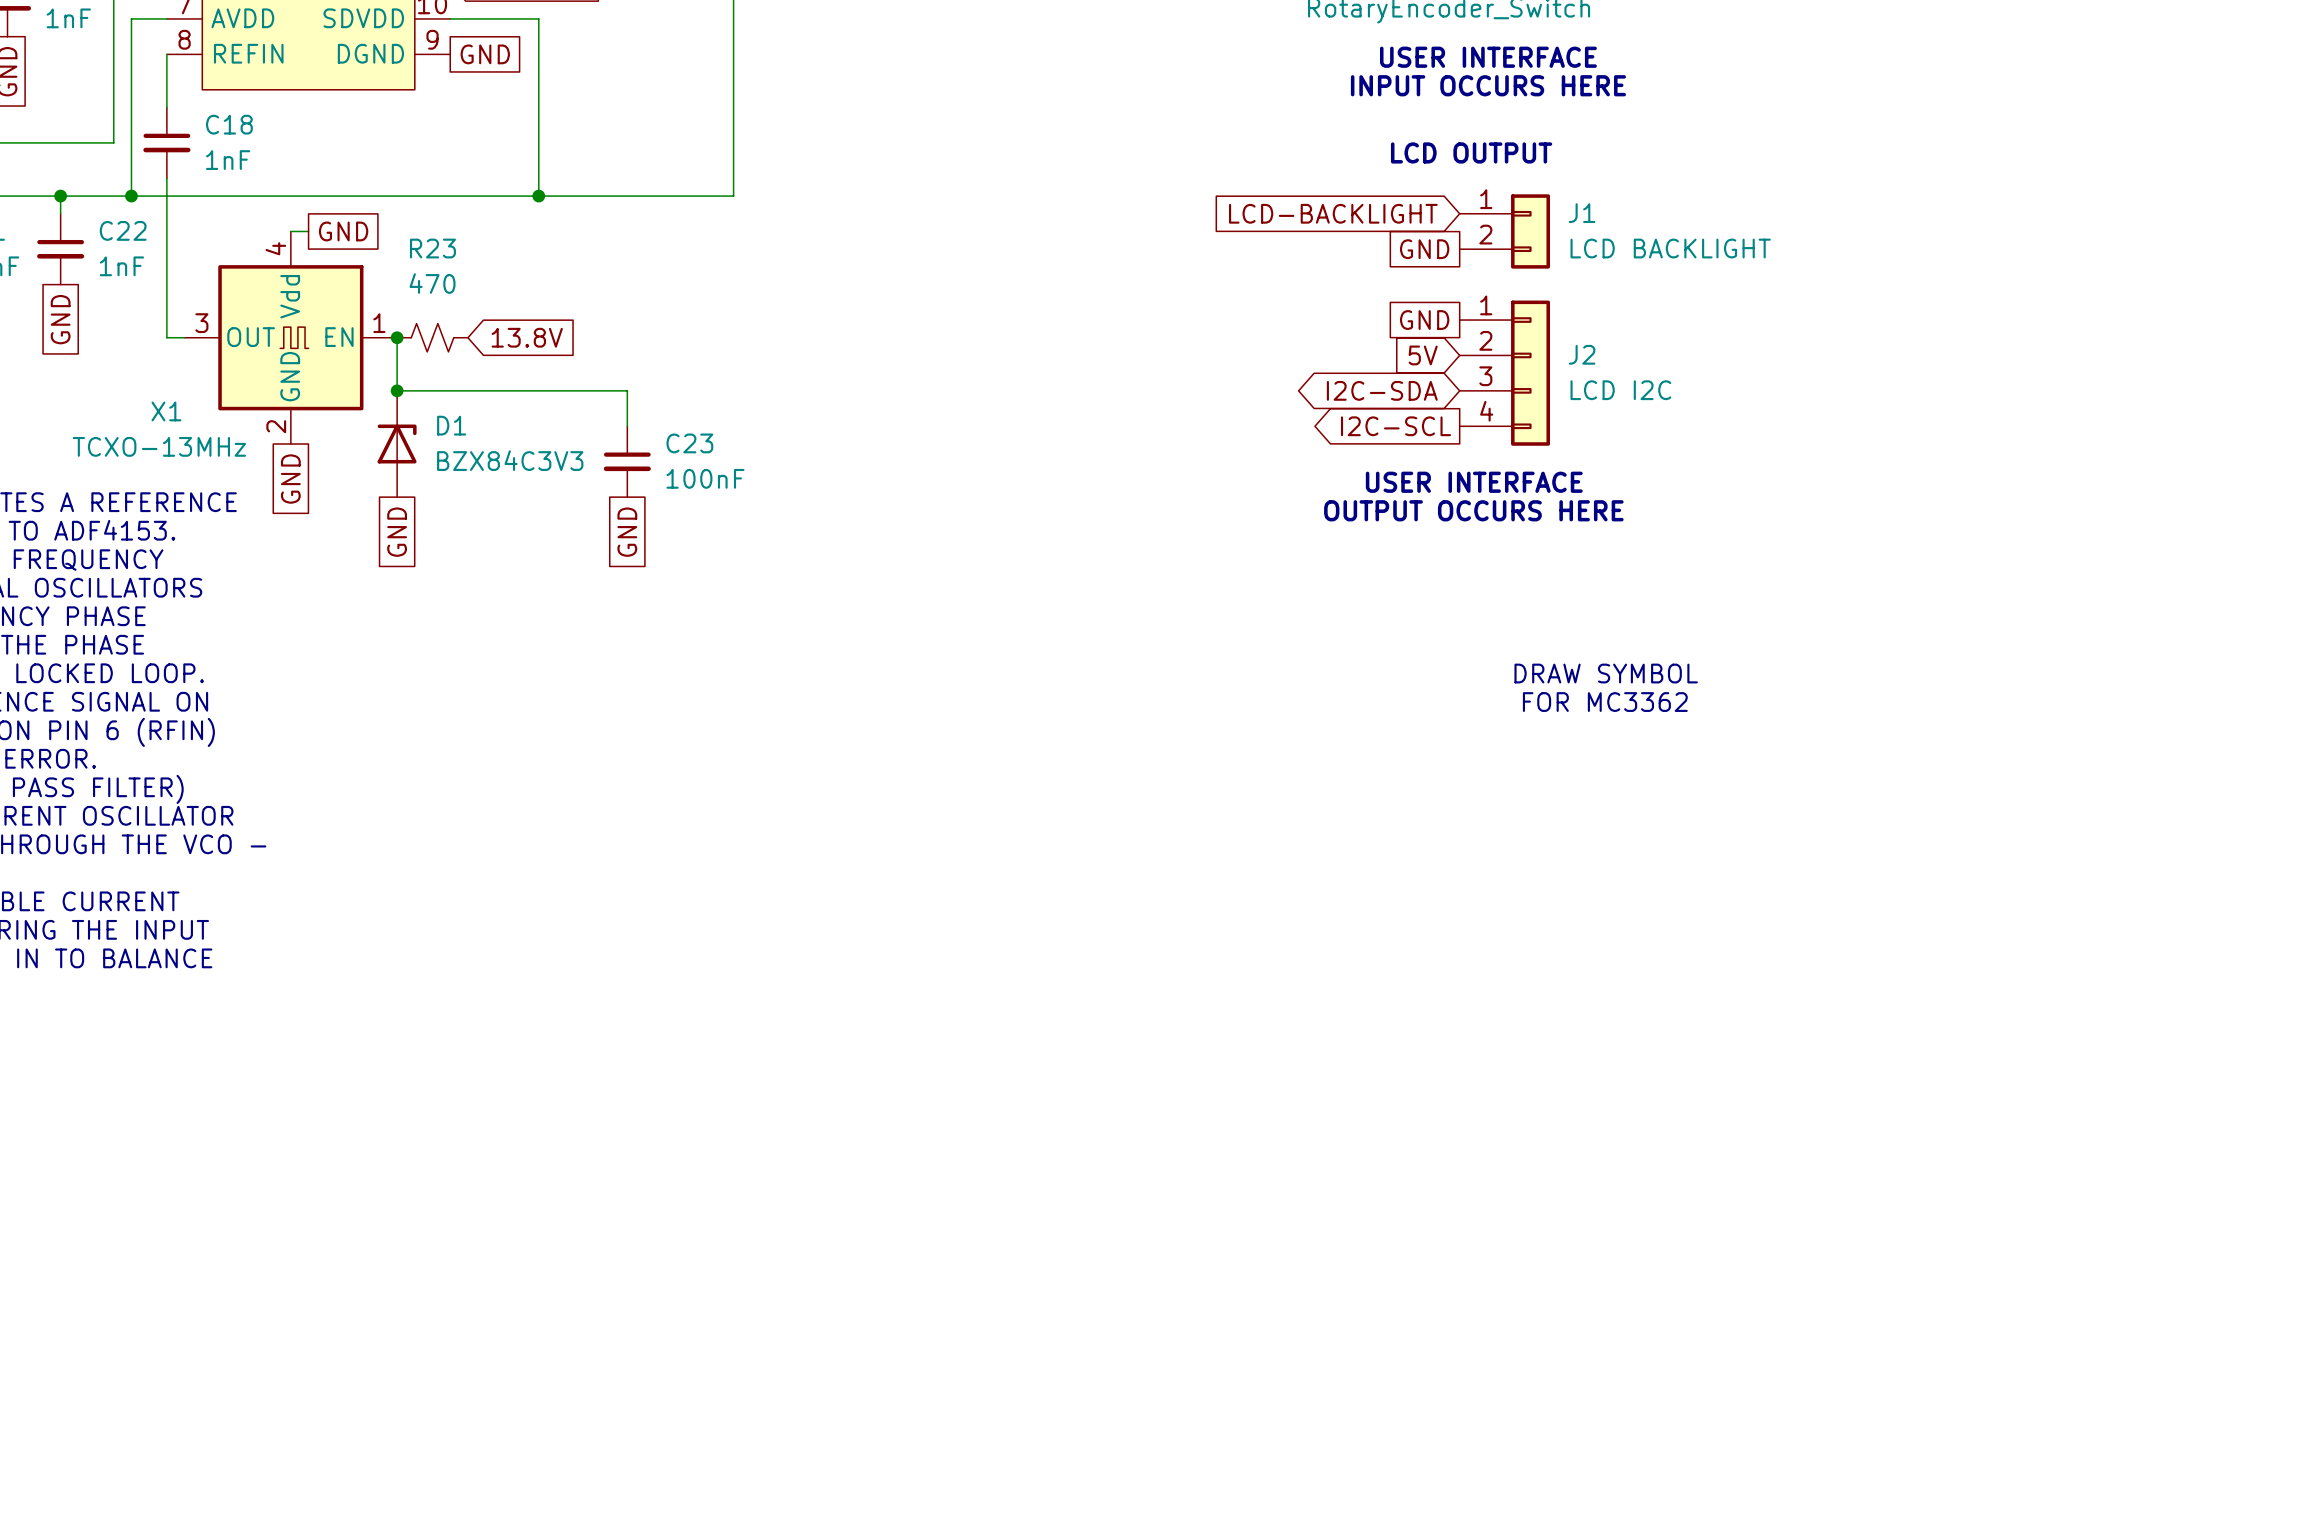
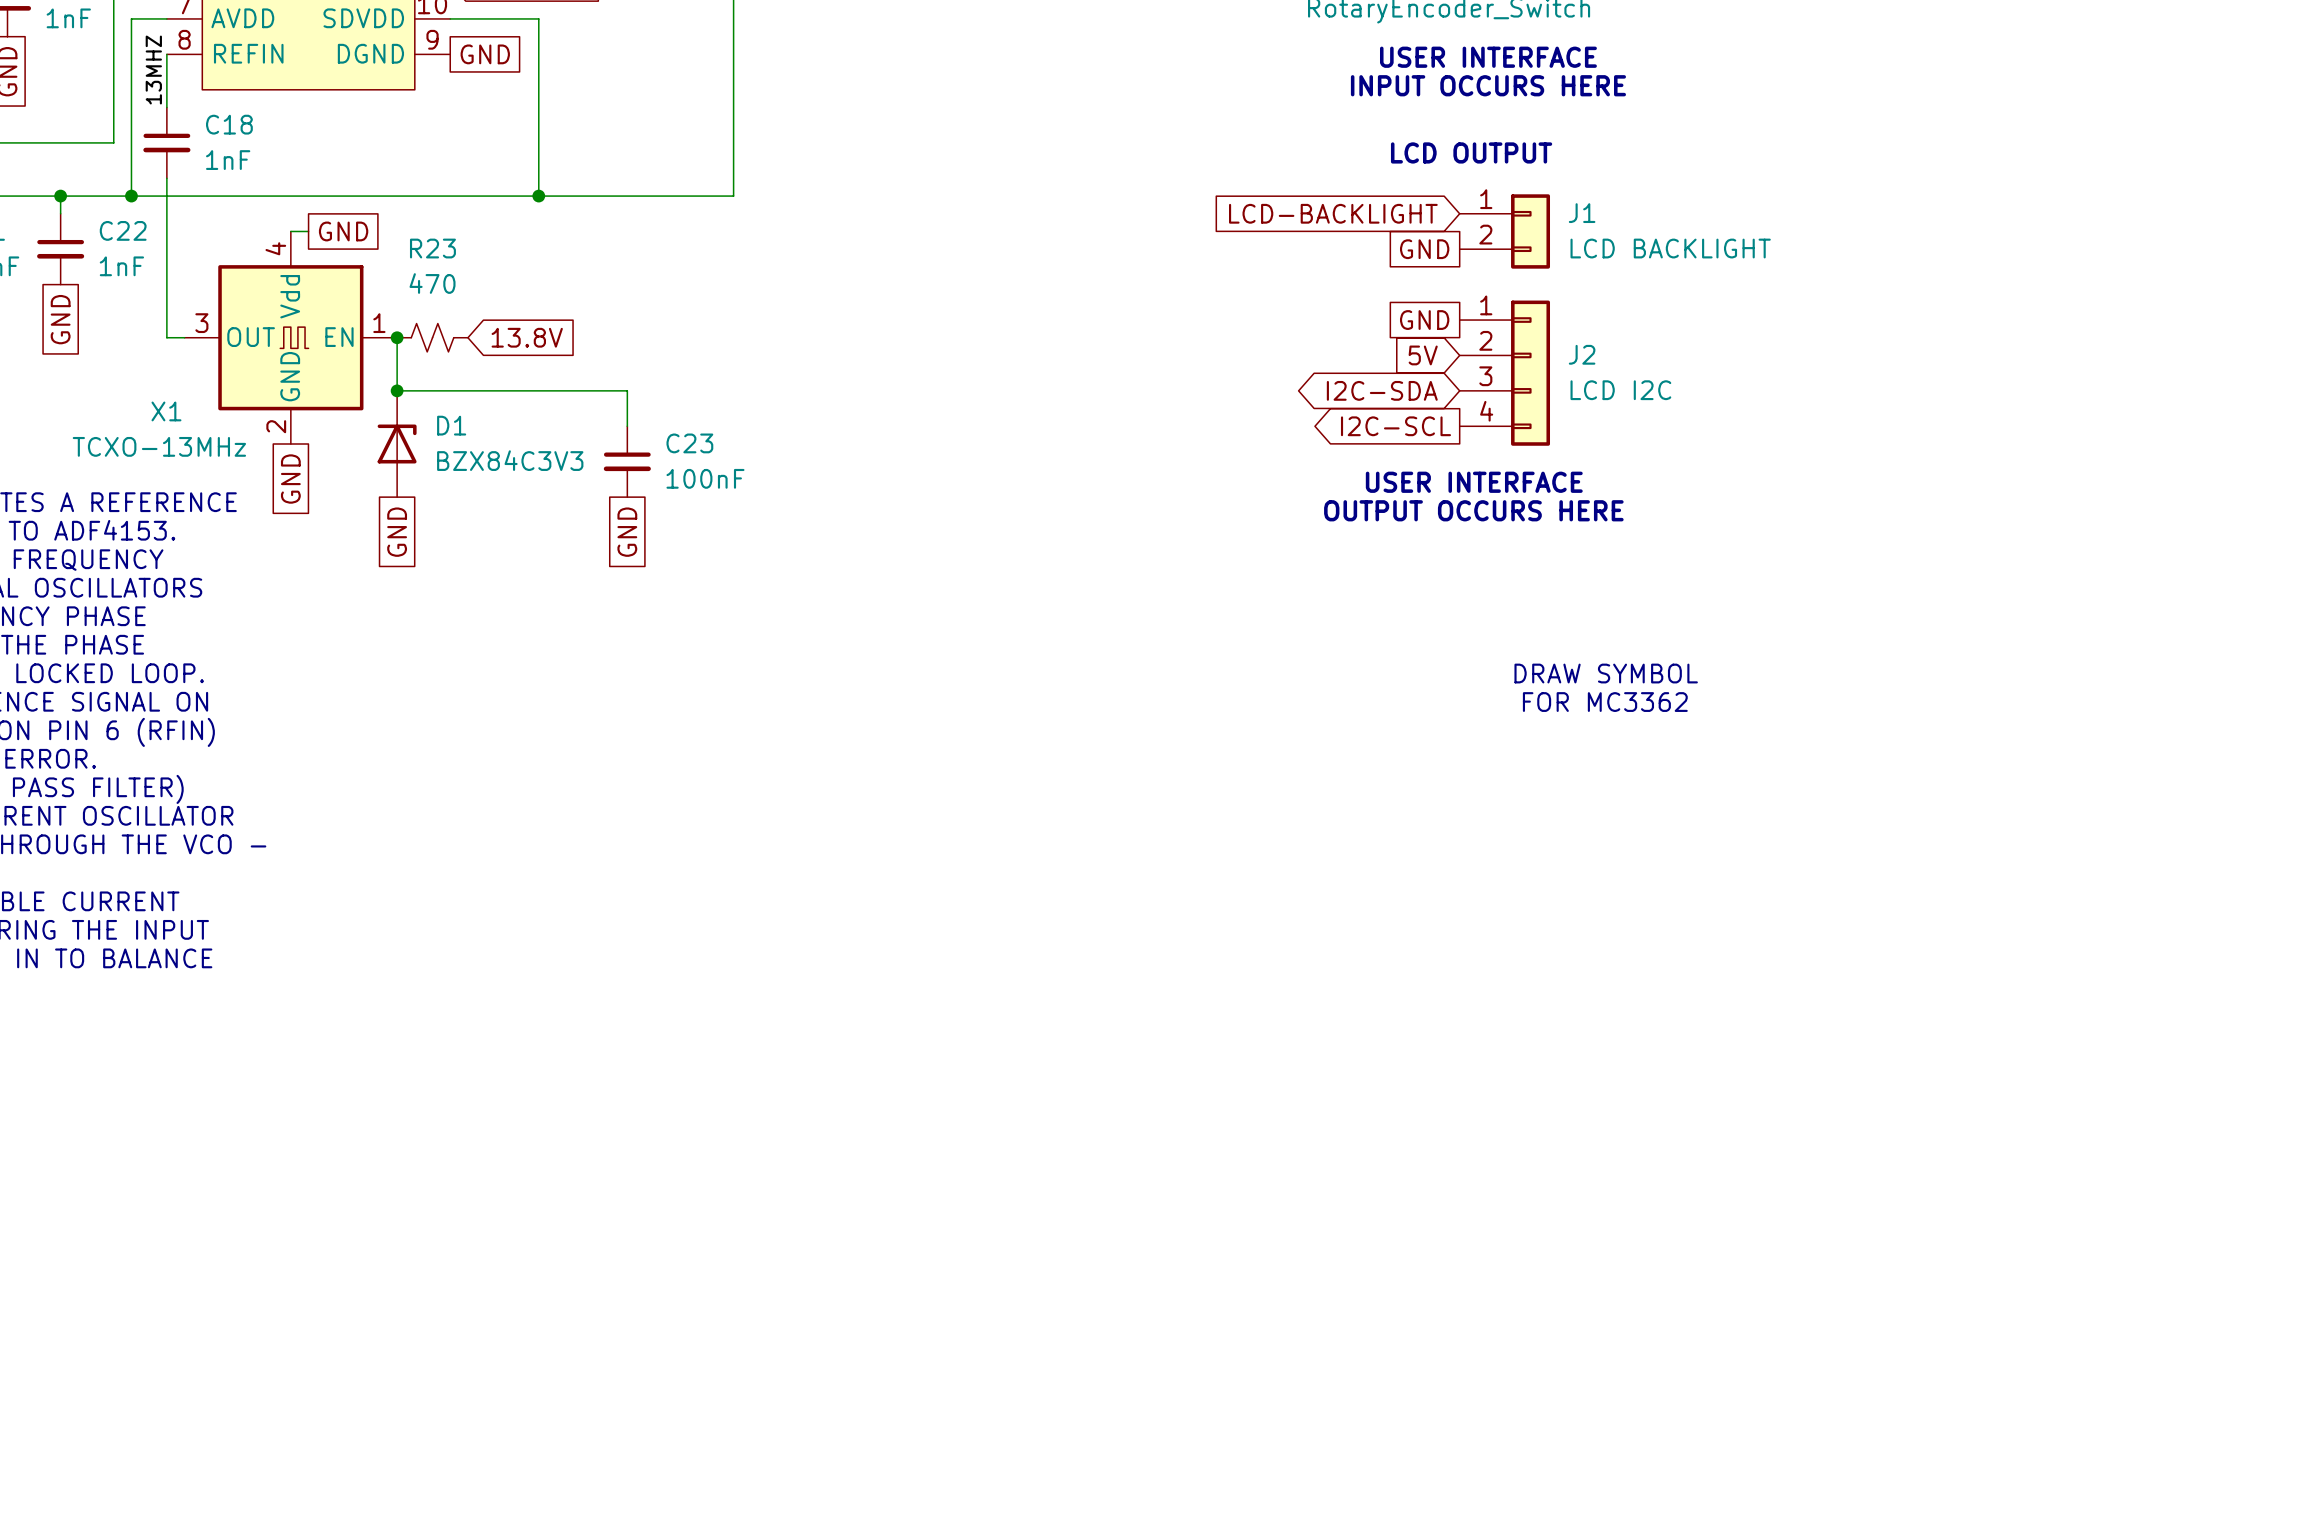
label: none -> 13MHZ (153, 70)

